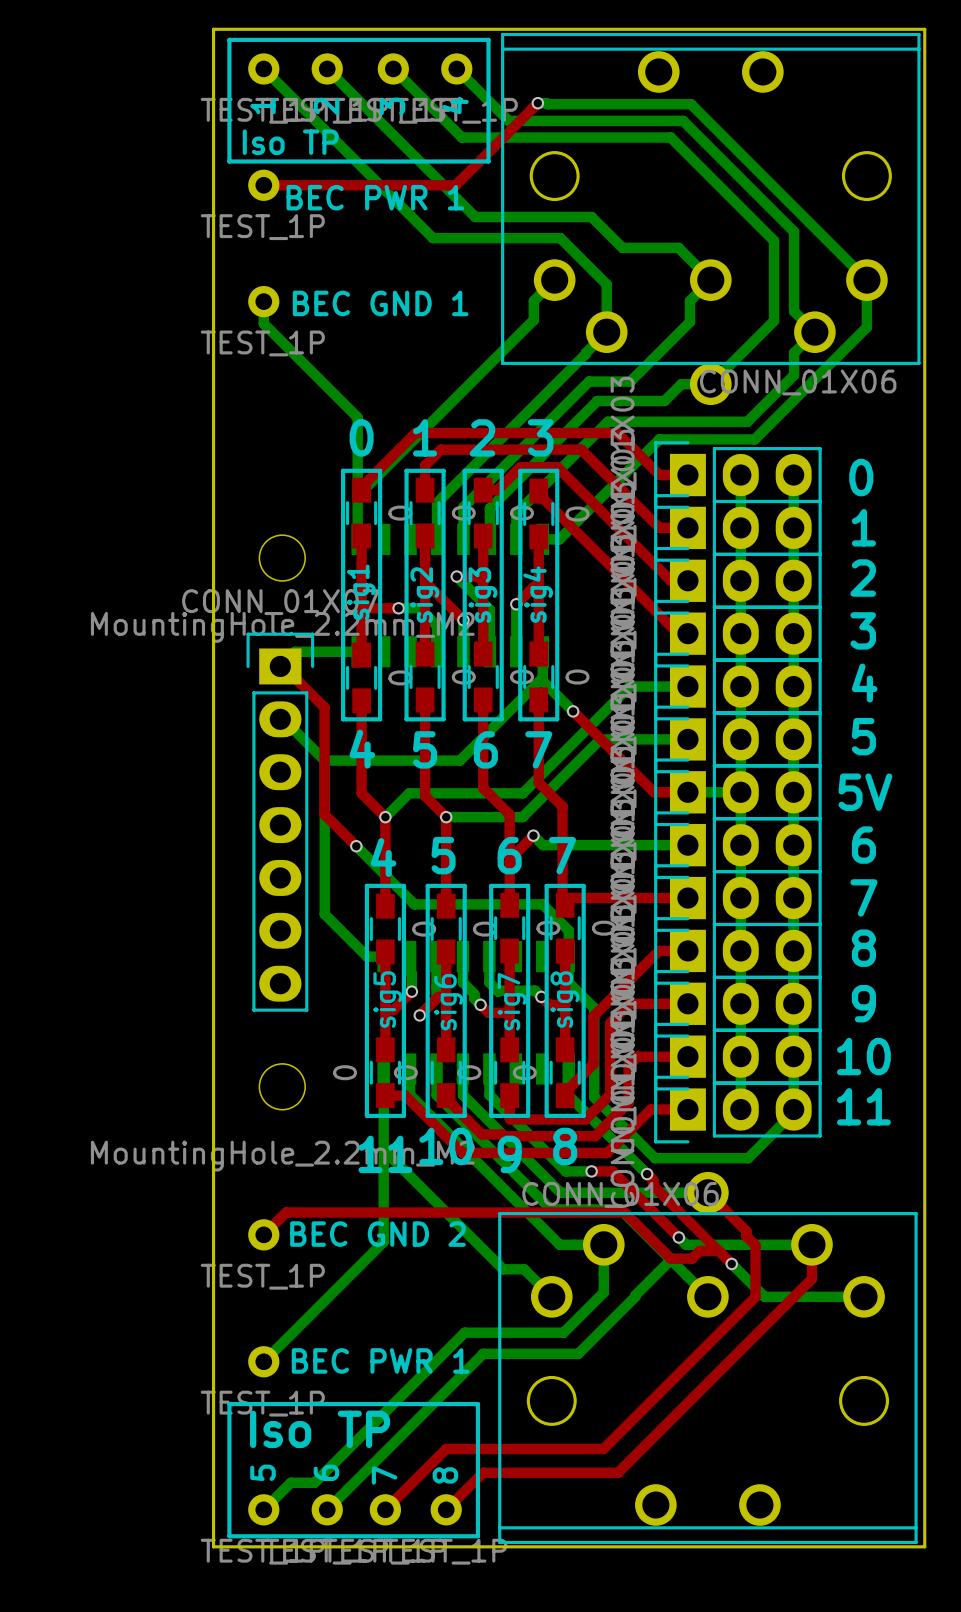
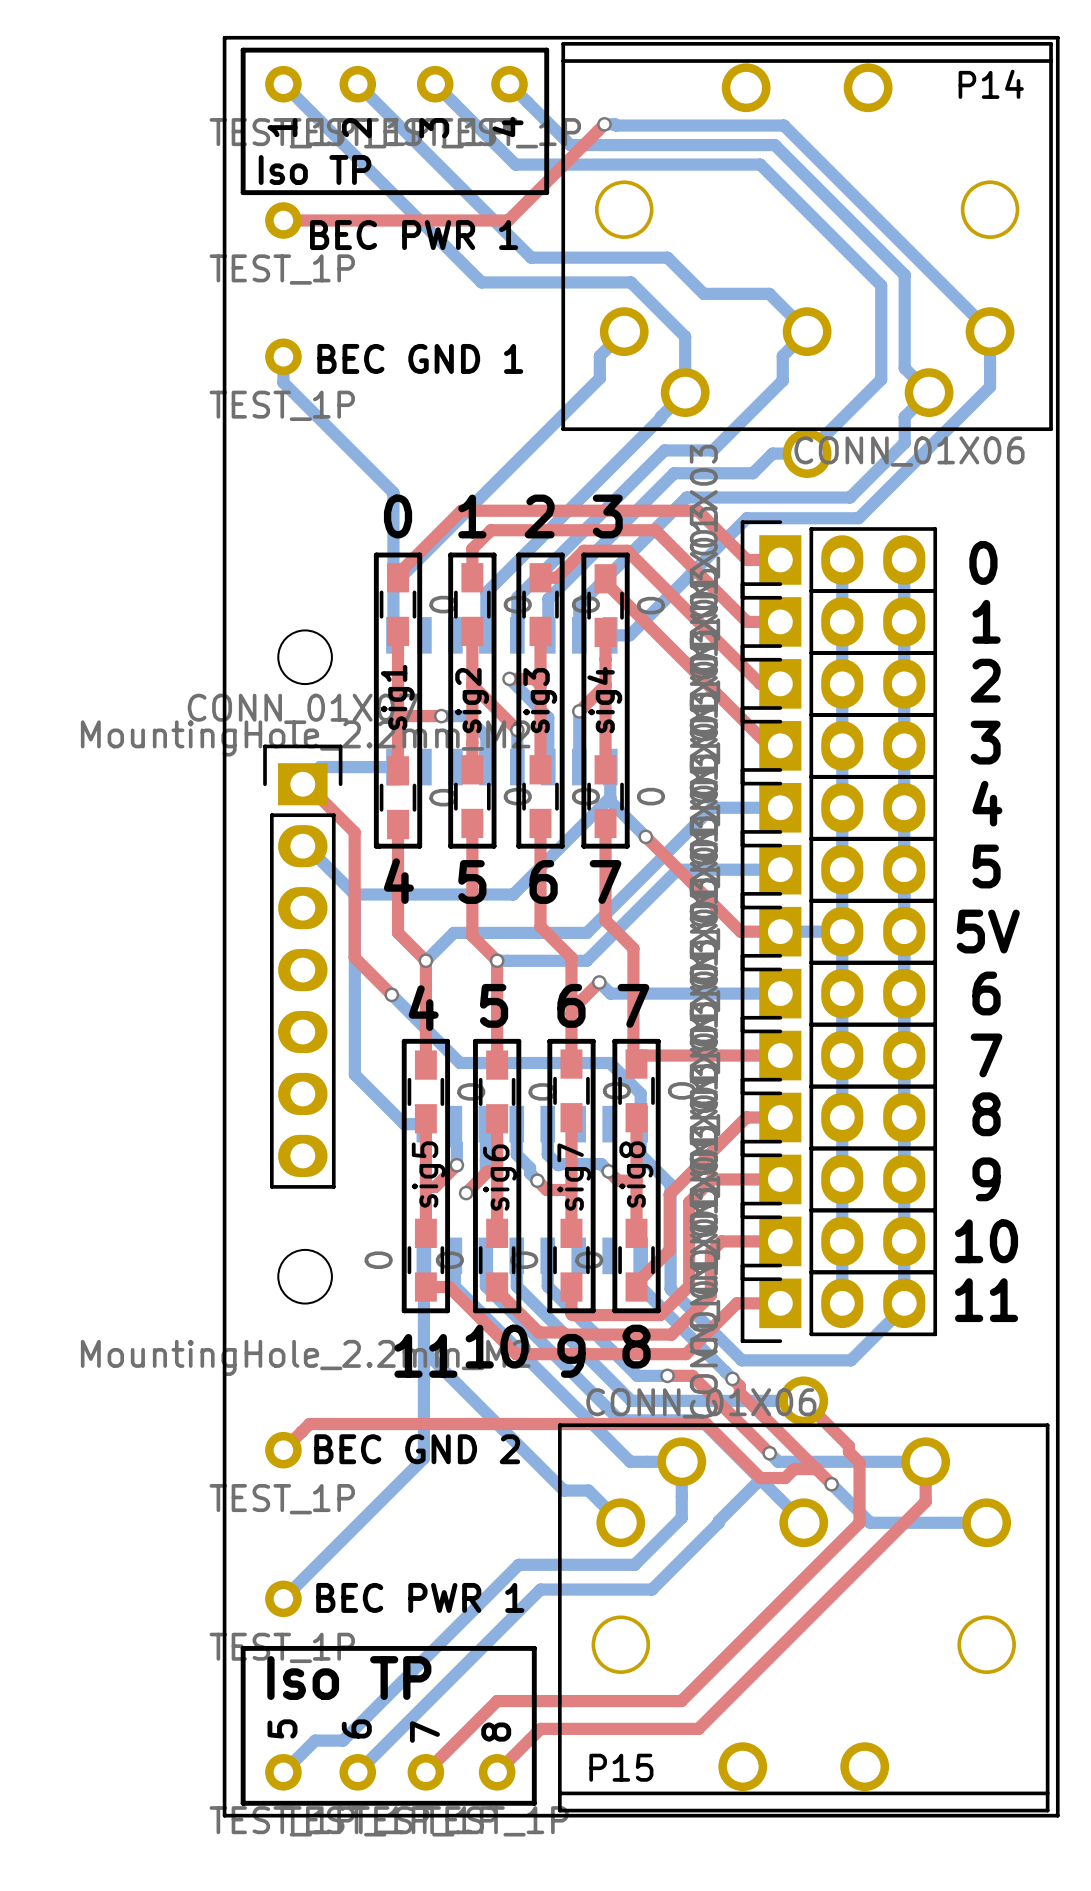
P14 name: none -> P14 (991, 84)
P15 name: none -> P15 (621, 1767)

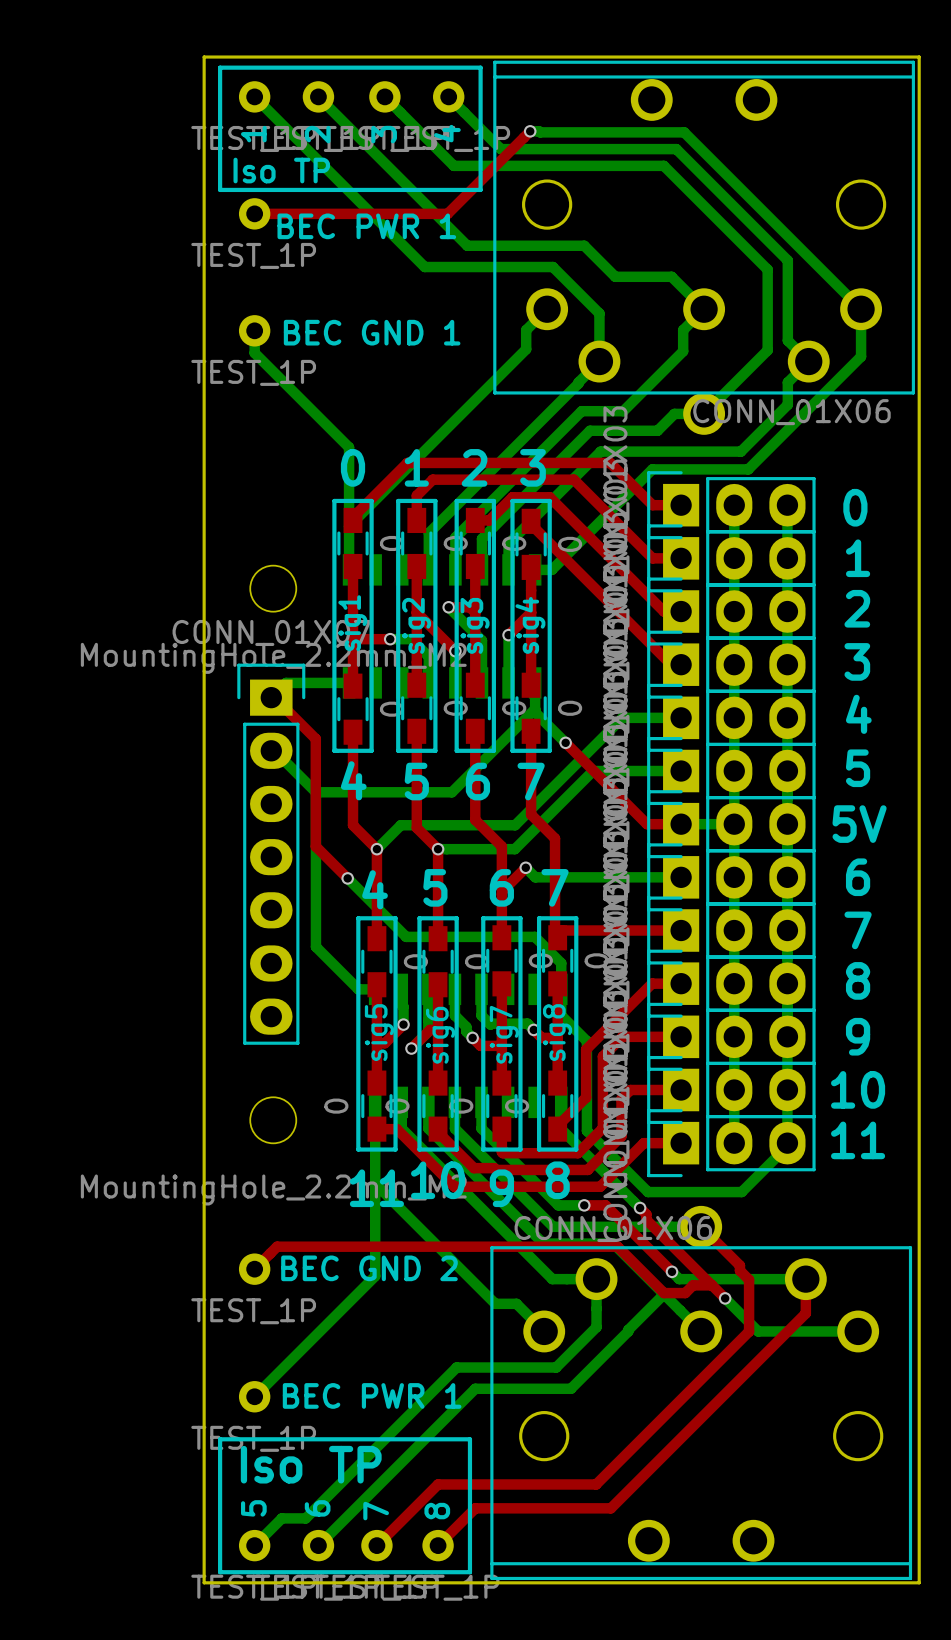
P14 name: P14 (991, 84) -> none
P15 name: P15 (621, 1767) -> none

